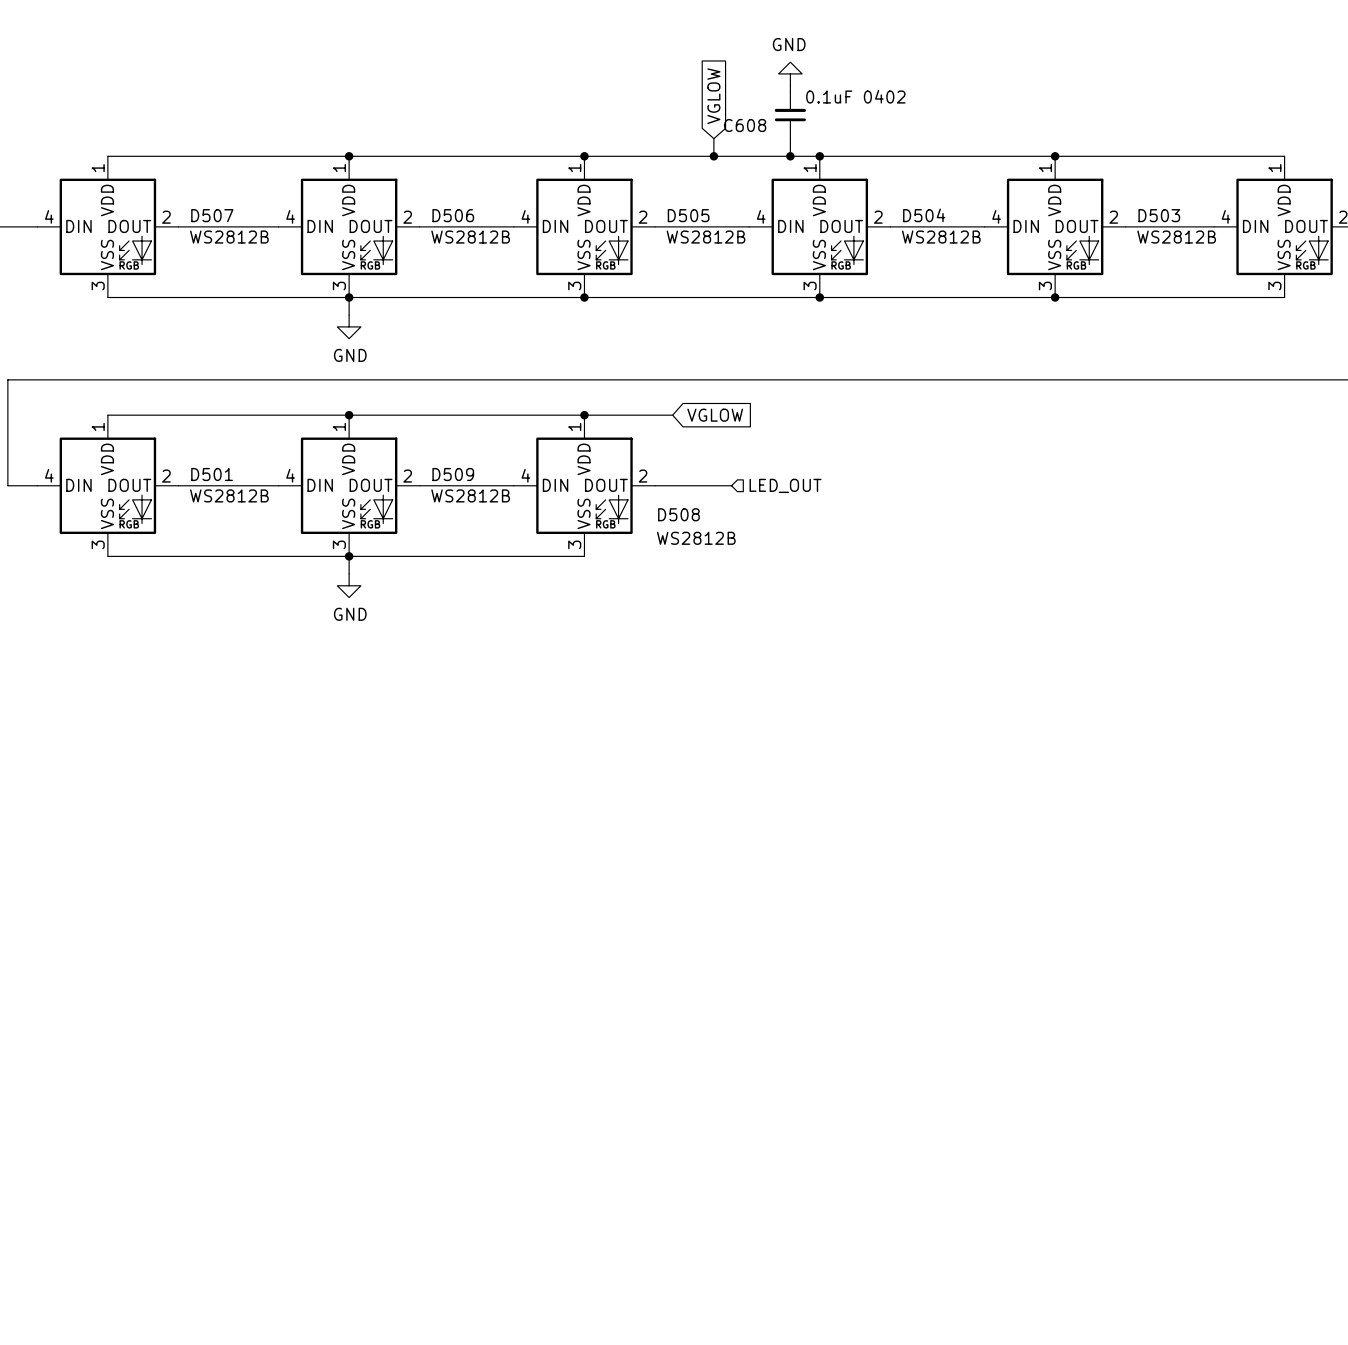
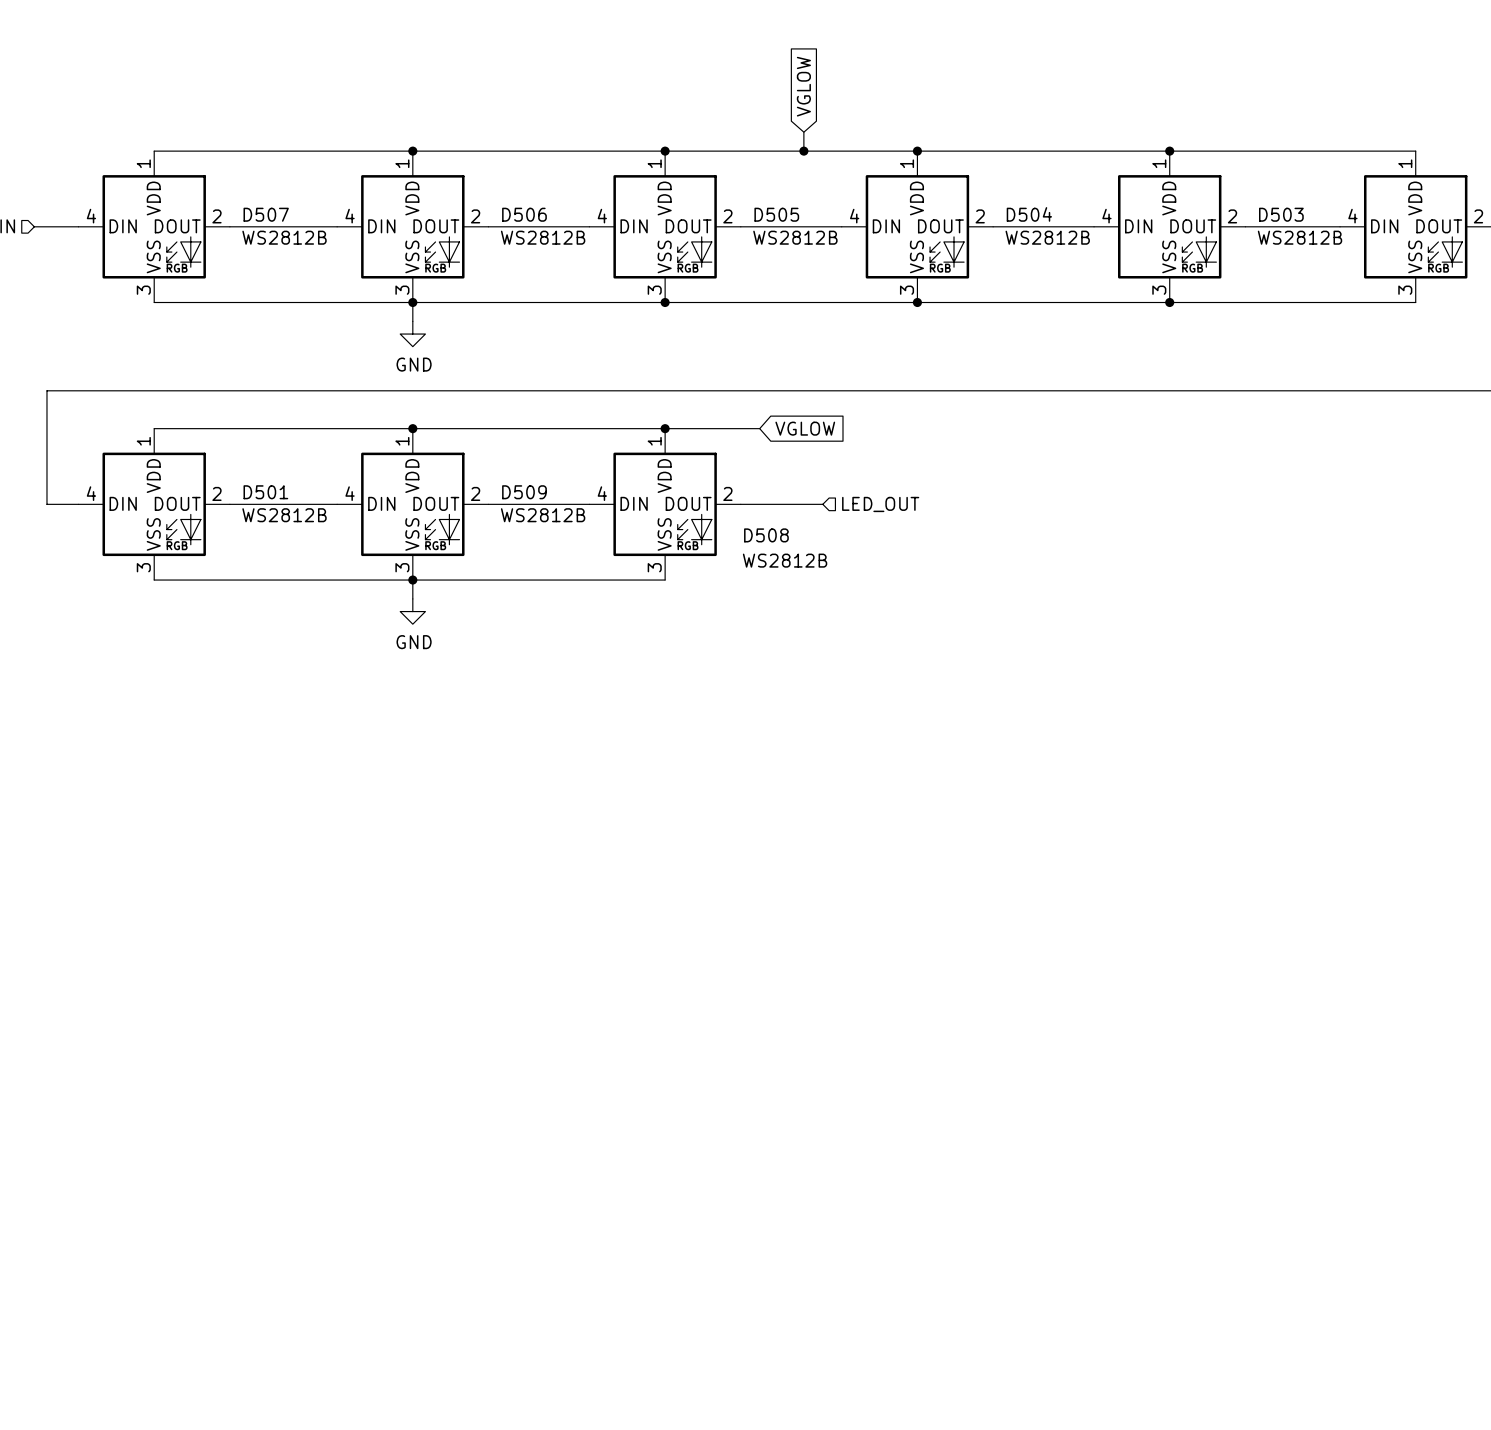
power symbol: GND (790, 73) -> none
wire: (790, 85) (790, 91) -> none
C608: 0.1uF 0402 (790, 115) -> none
wire: (790, 138) (790, 156) -> none
junction: (790, 156) -> none

